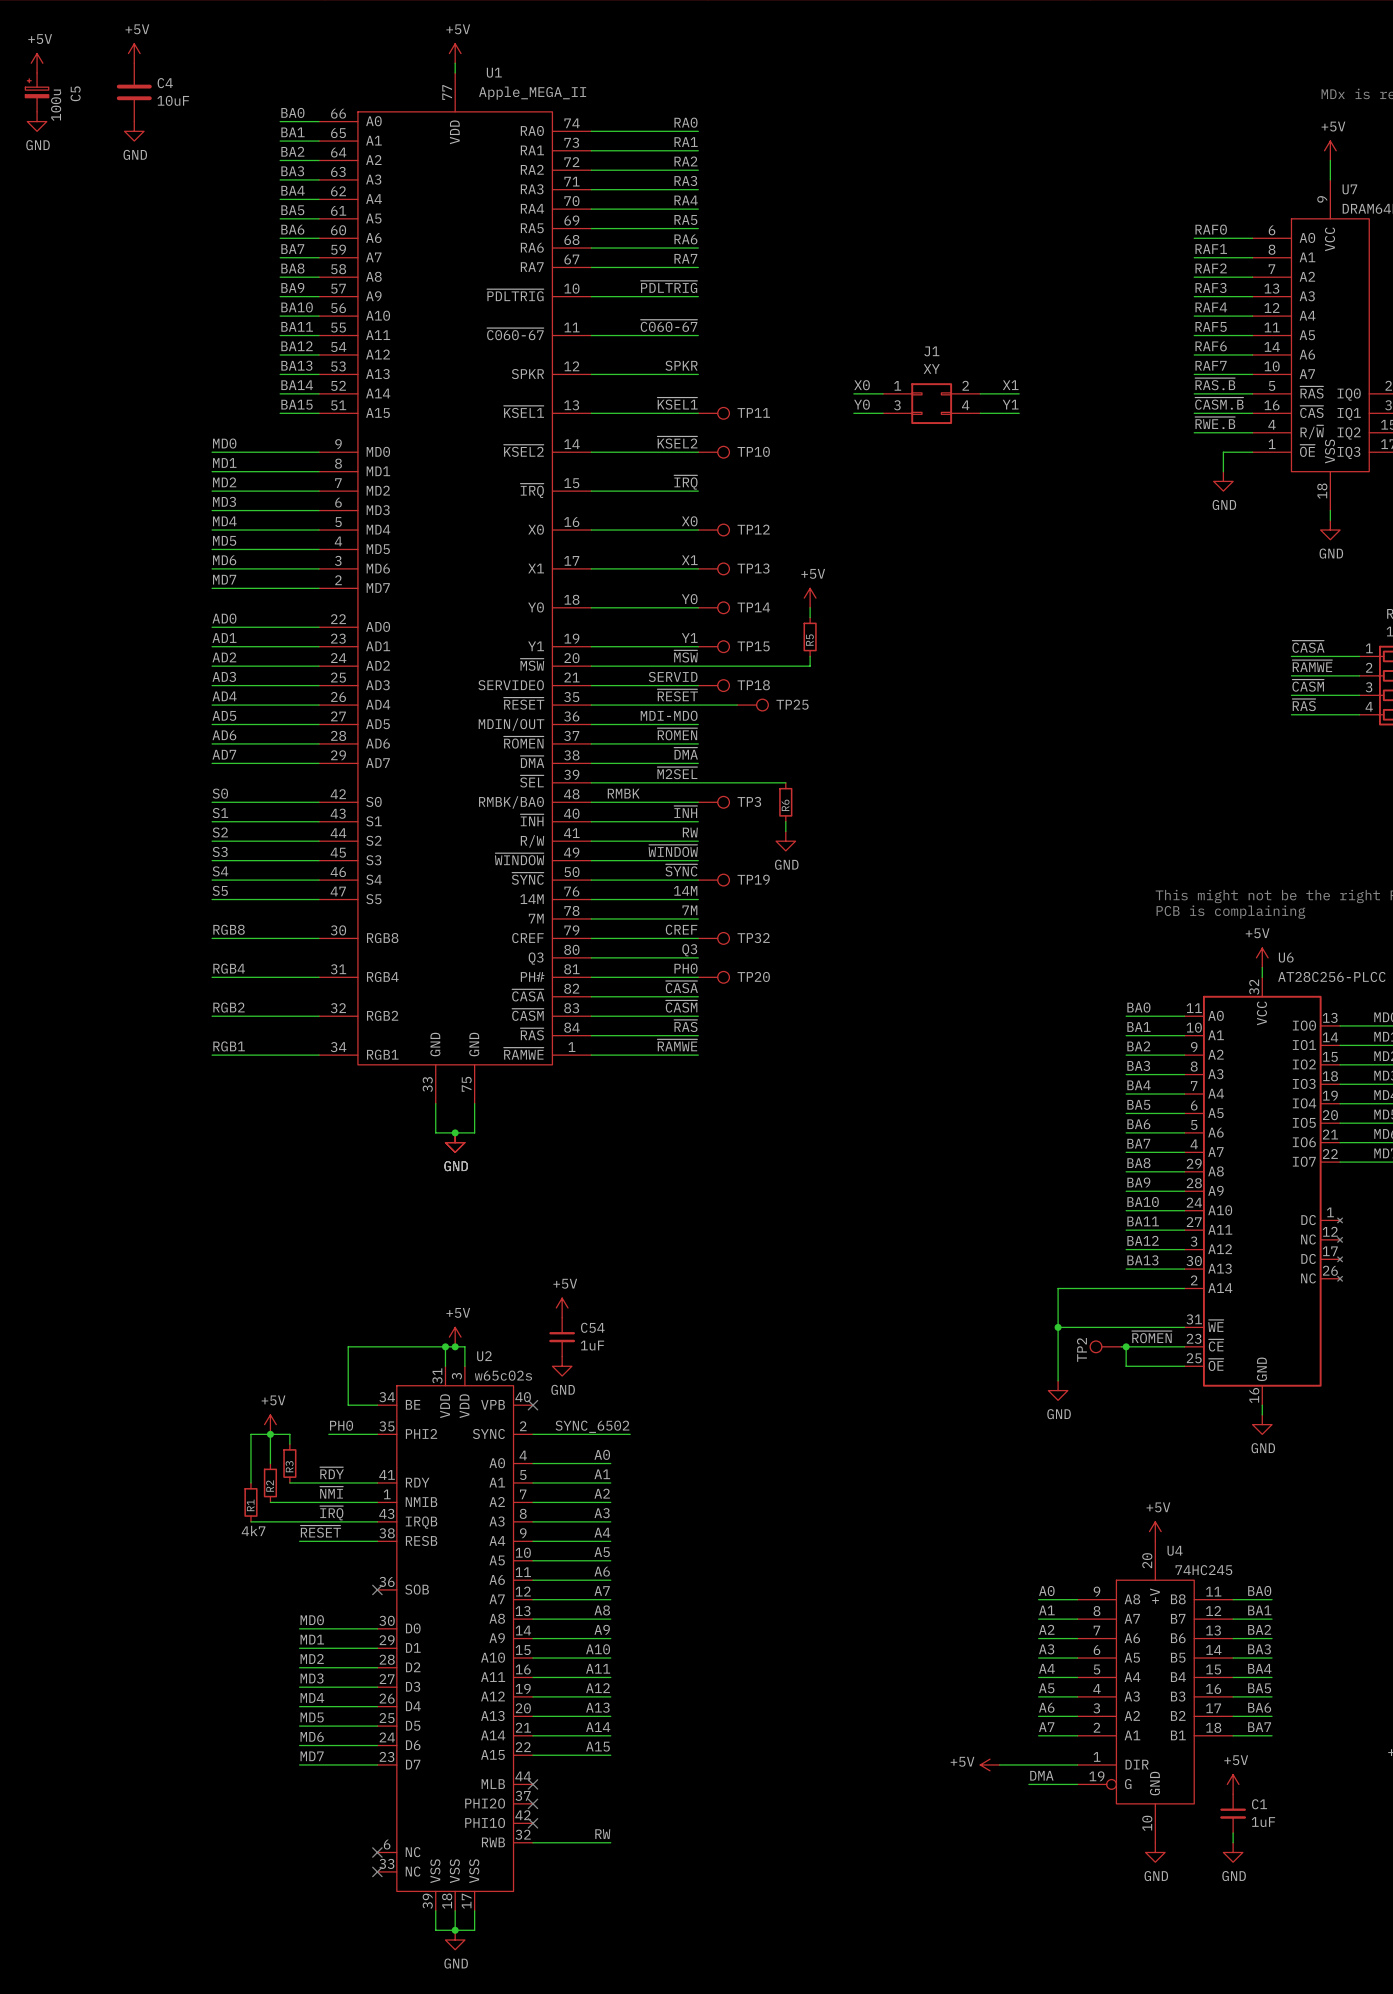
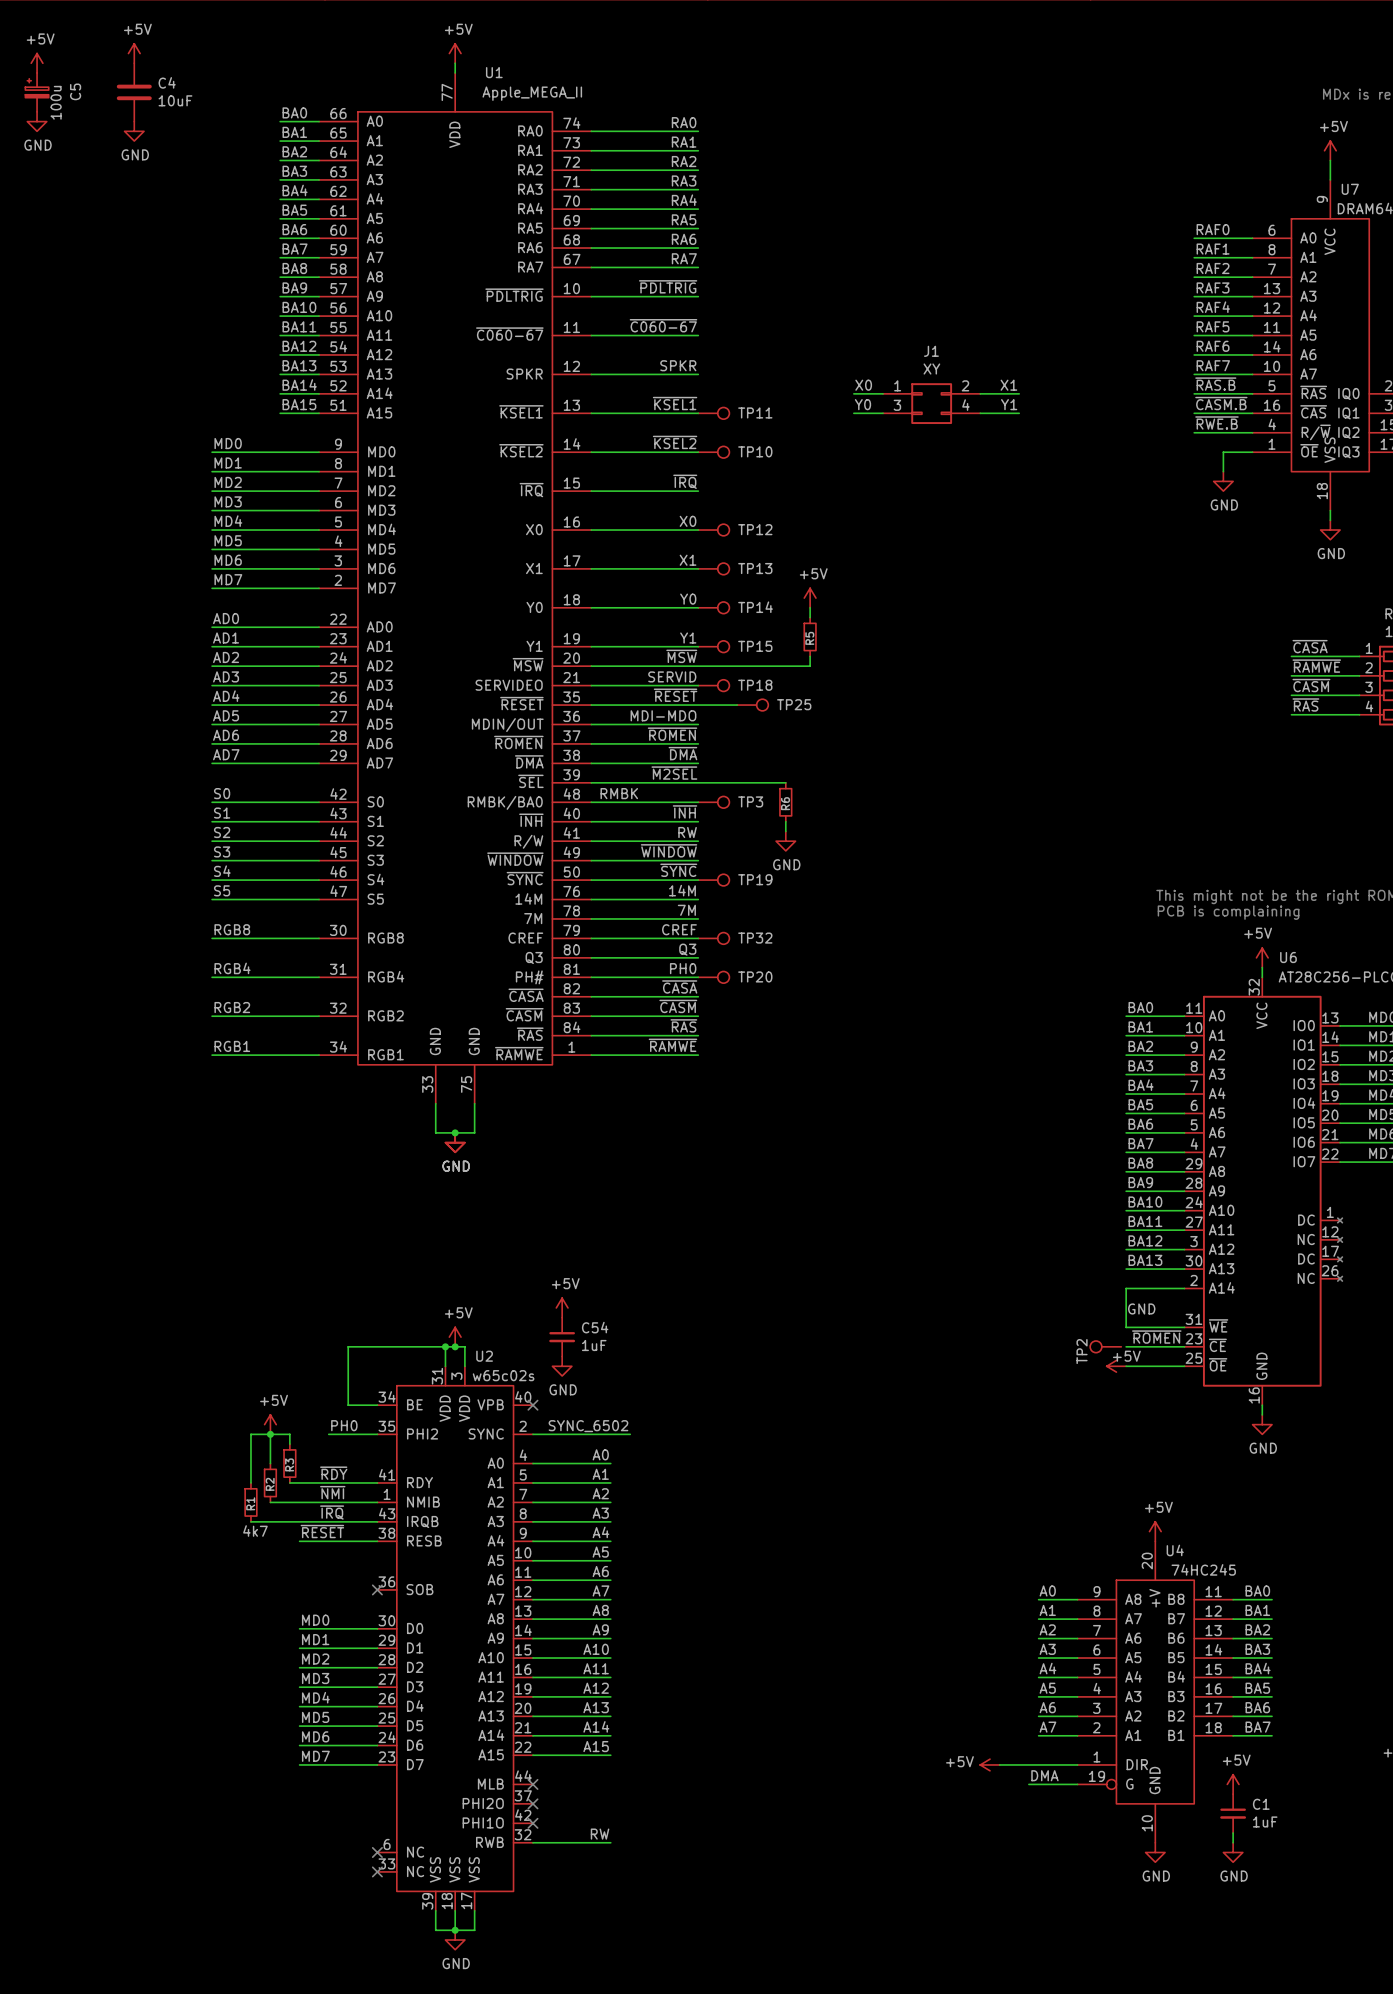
wire: (1126, 1288) (1058, 1288) (1058, 1380) -> none
label: none -> GND (1141, 1308)
wire: (1058, 1327) (1126, 1327) -> (1126, 1288) (1126, 1327)
junction: (1058, 1327) -> none
wire: (1121, 1346) (1126, 1346) (1126, 1366) -> none
junction: (1126, 1346) -> none
power symbol: none -> +5V (1116, 1366)
power symbol: GND (1058, 1390) -> none

